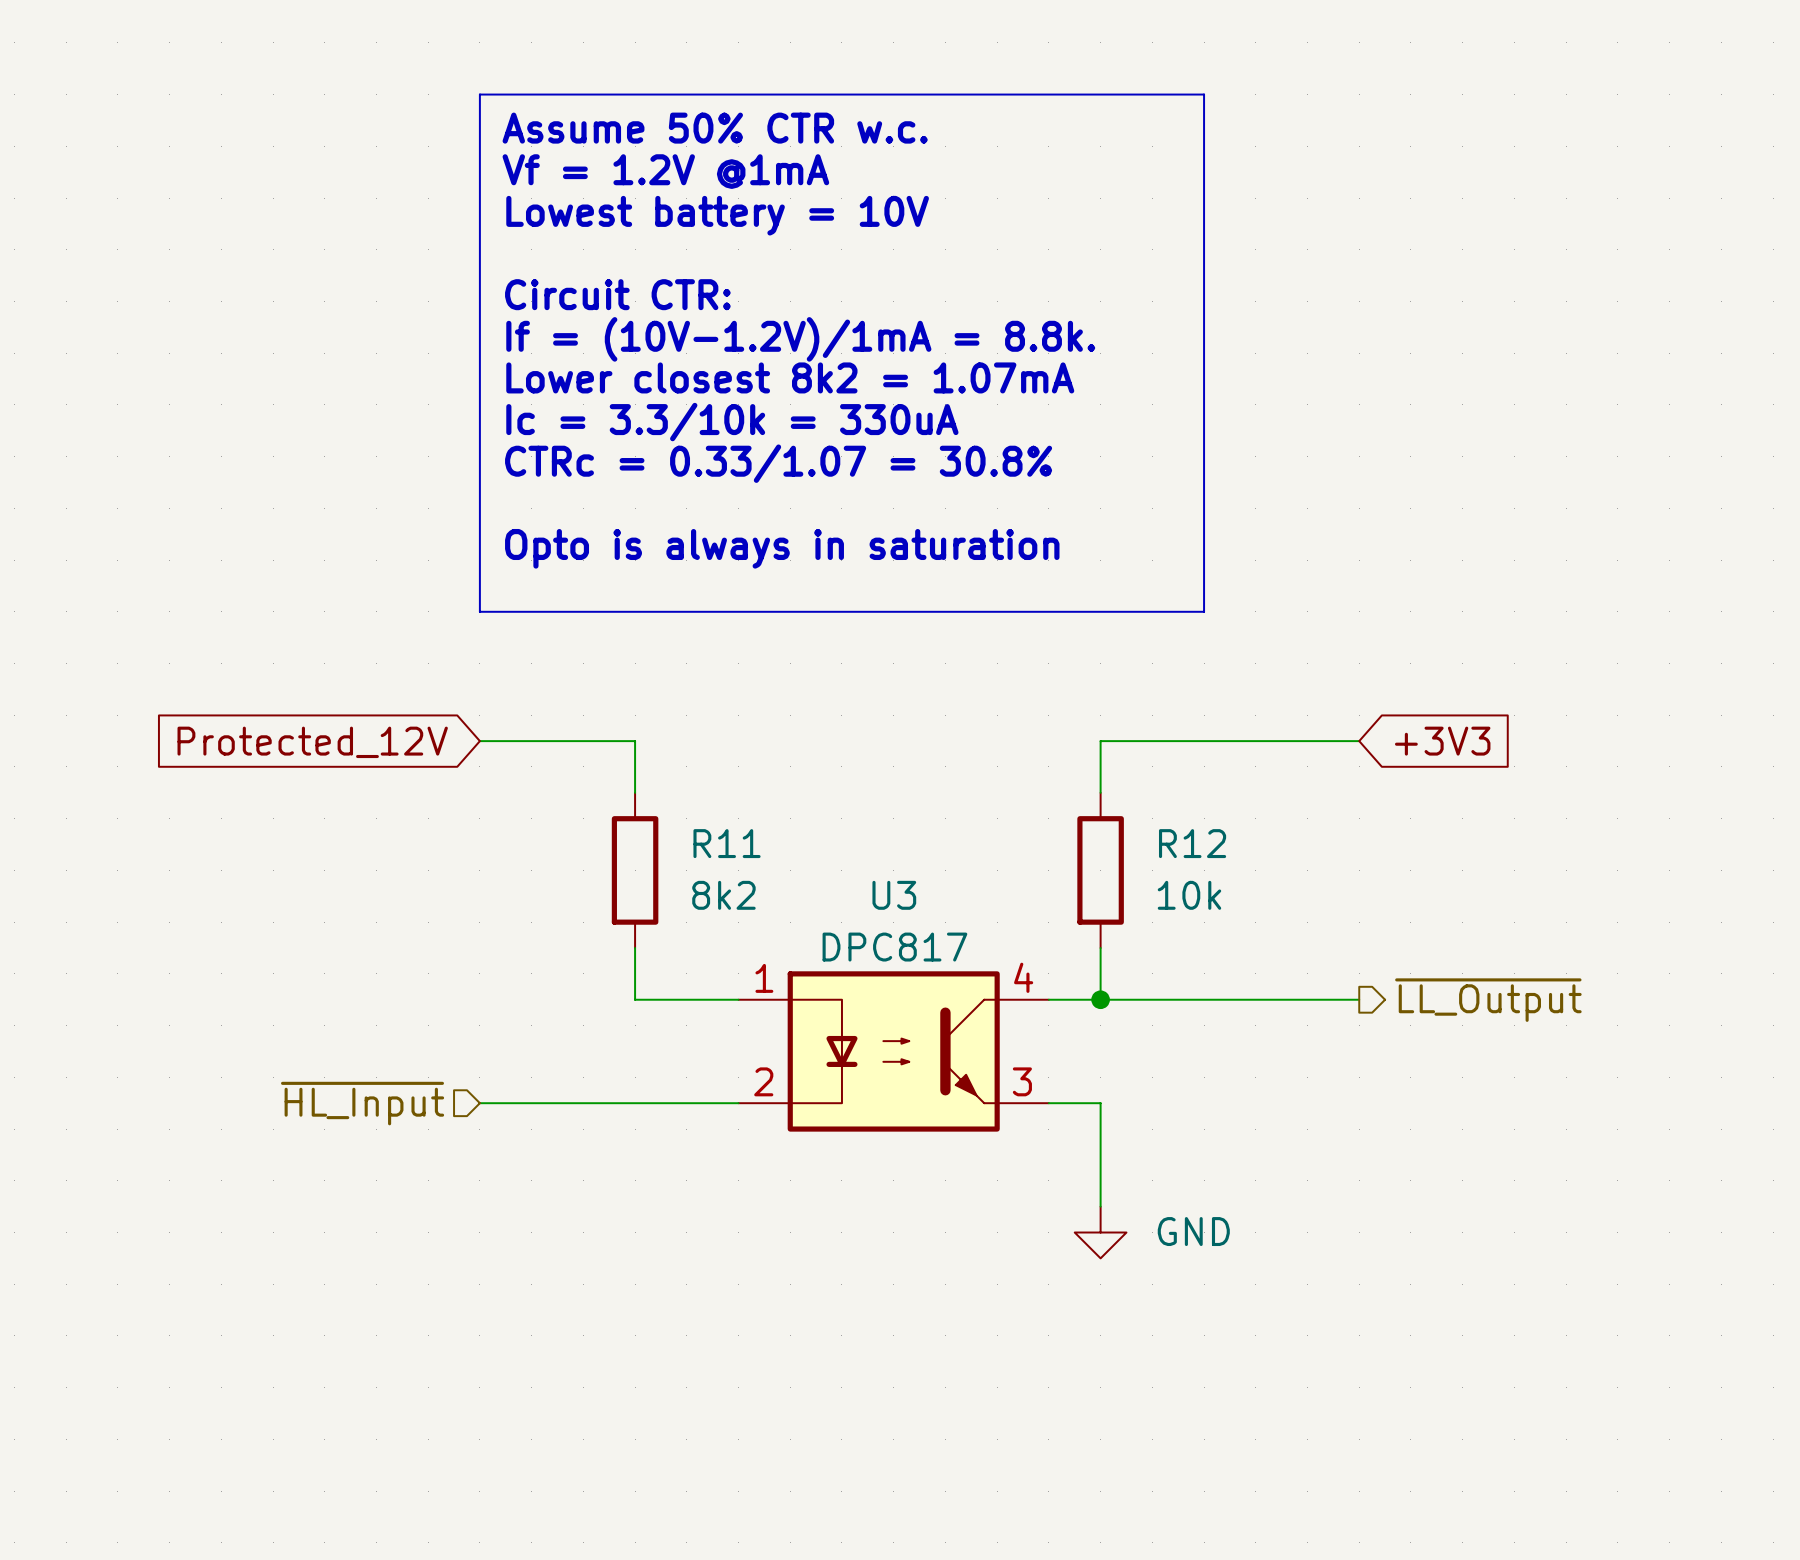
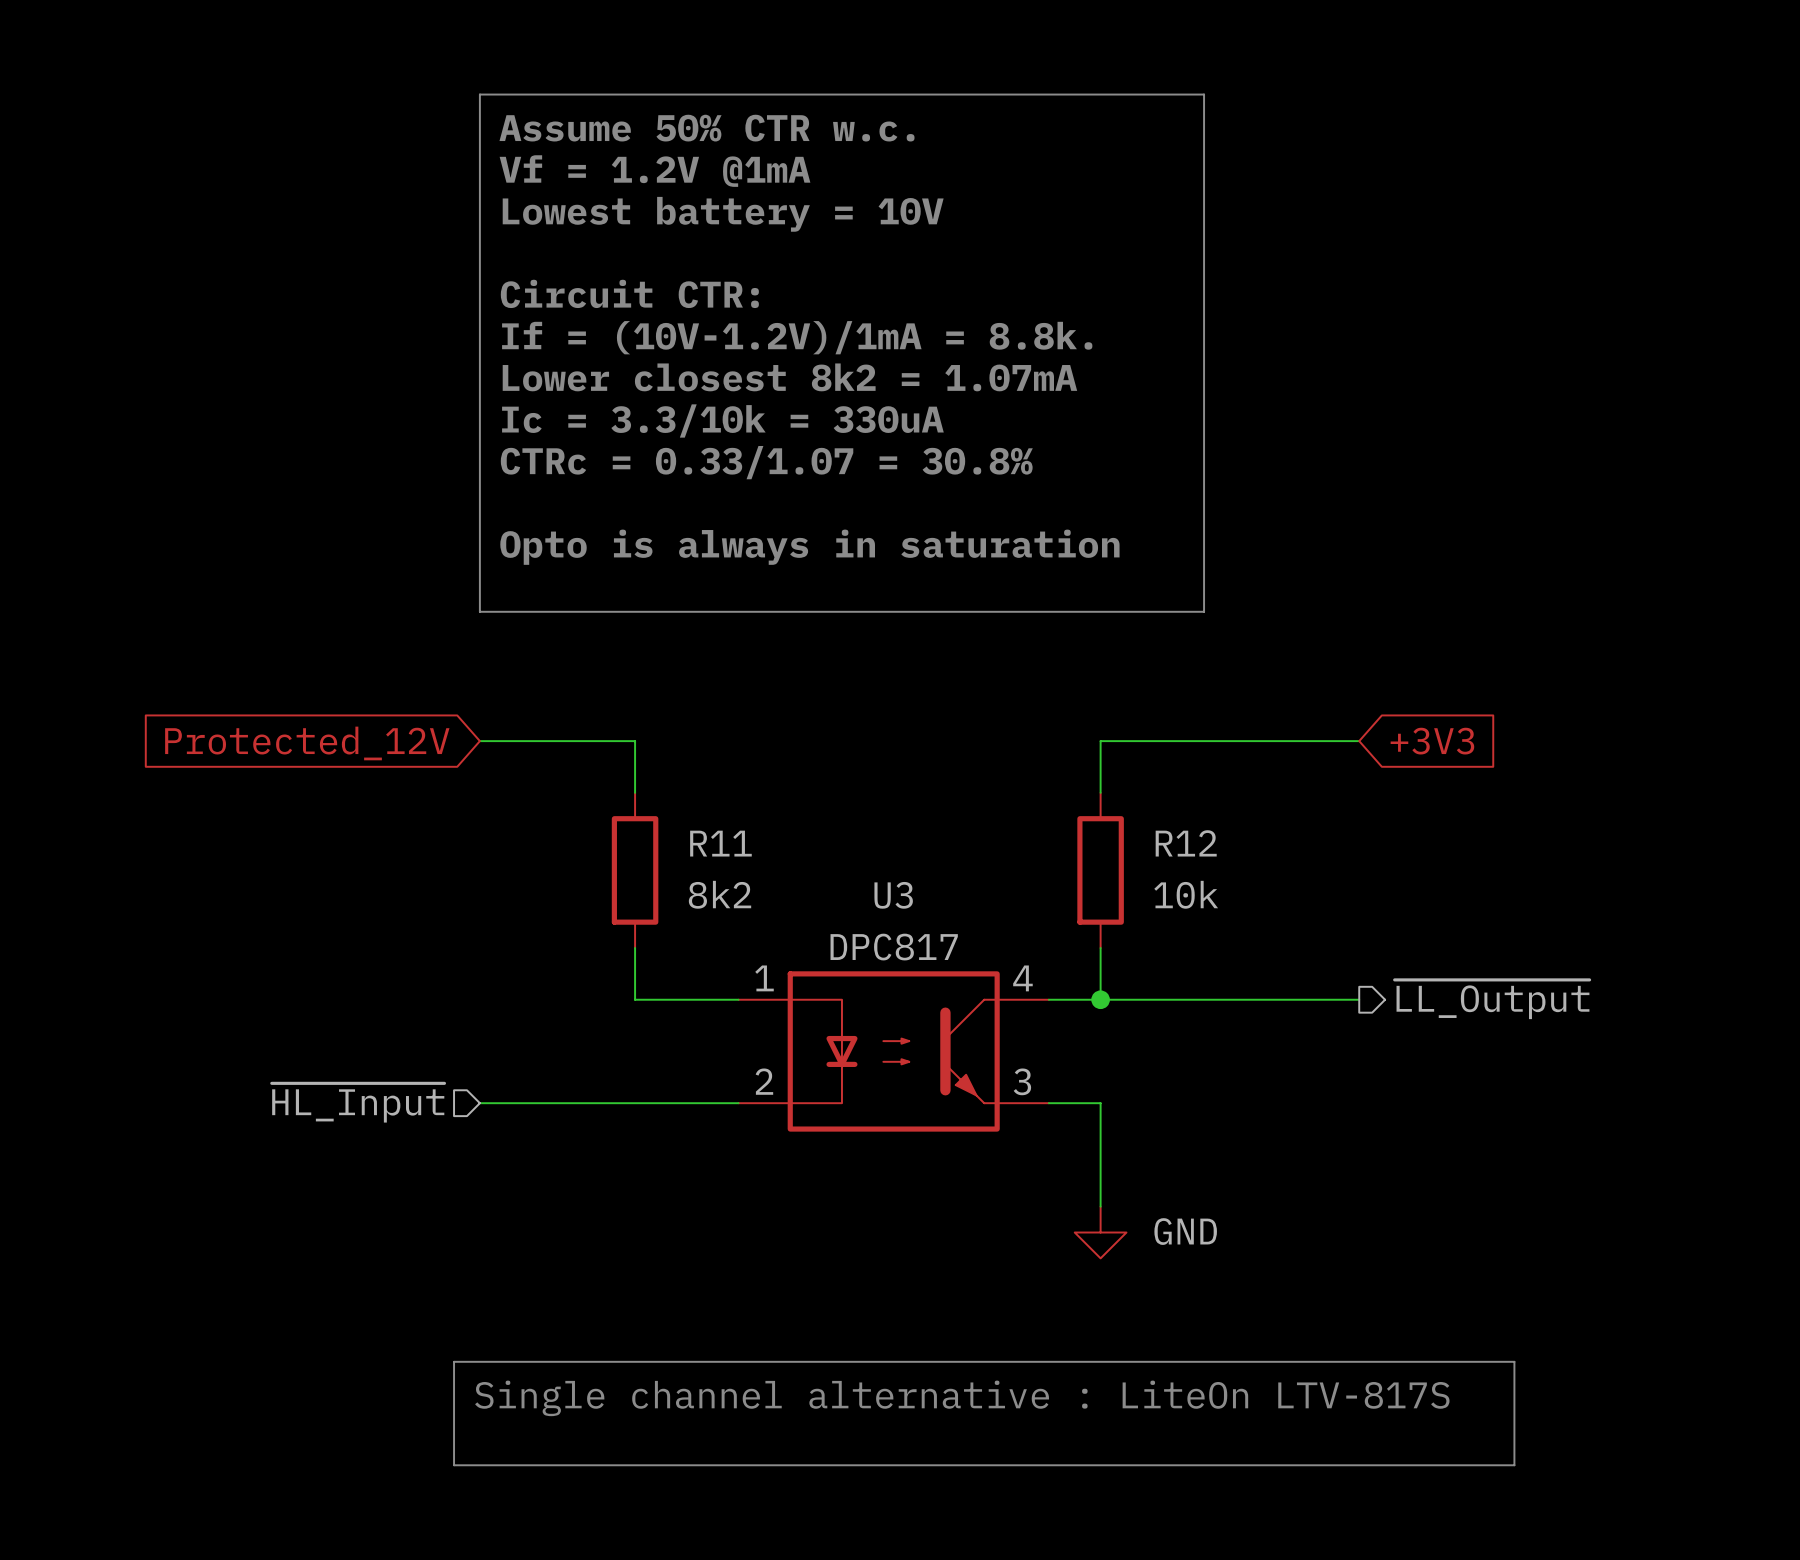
line: none -> (454, 1361) (1514, 1361) (1514, 1465) (454, 1465) (454, 1361)
text: none -> Single channel alternative : LiteOn LTV-817S (962, 1398)

